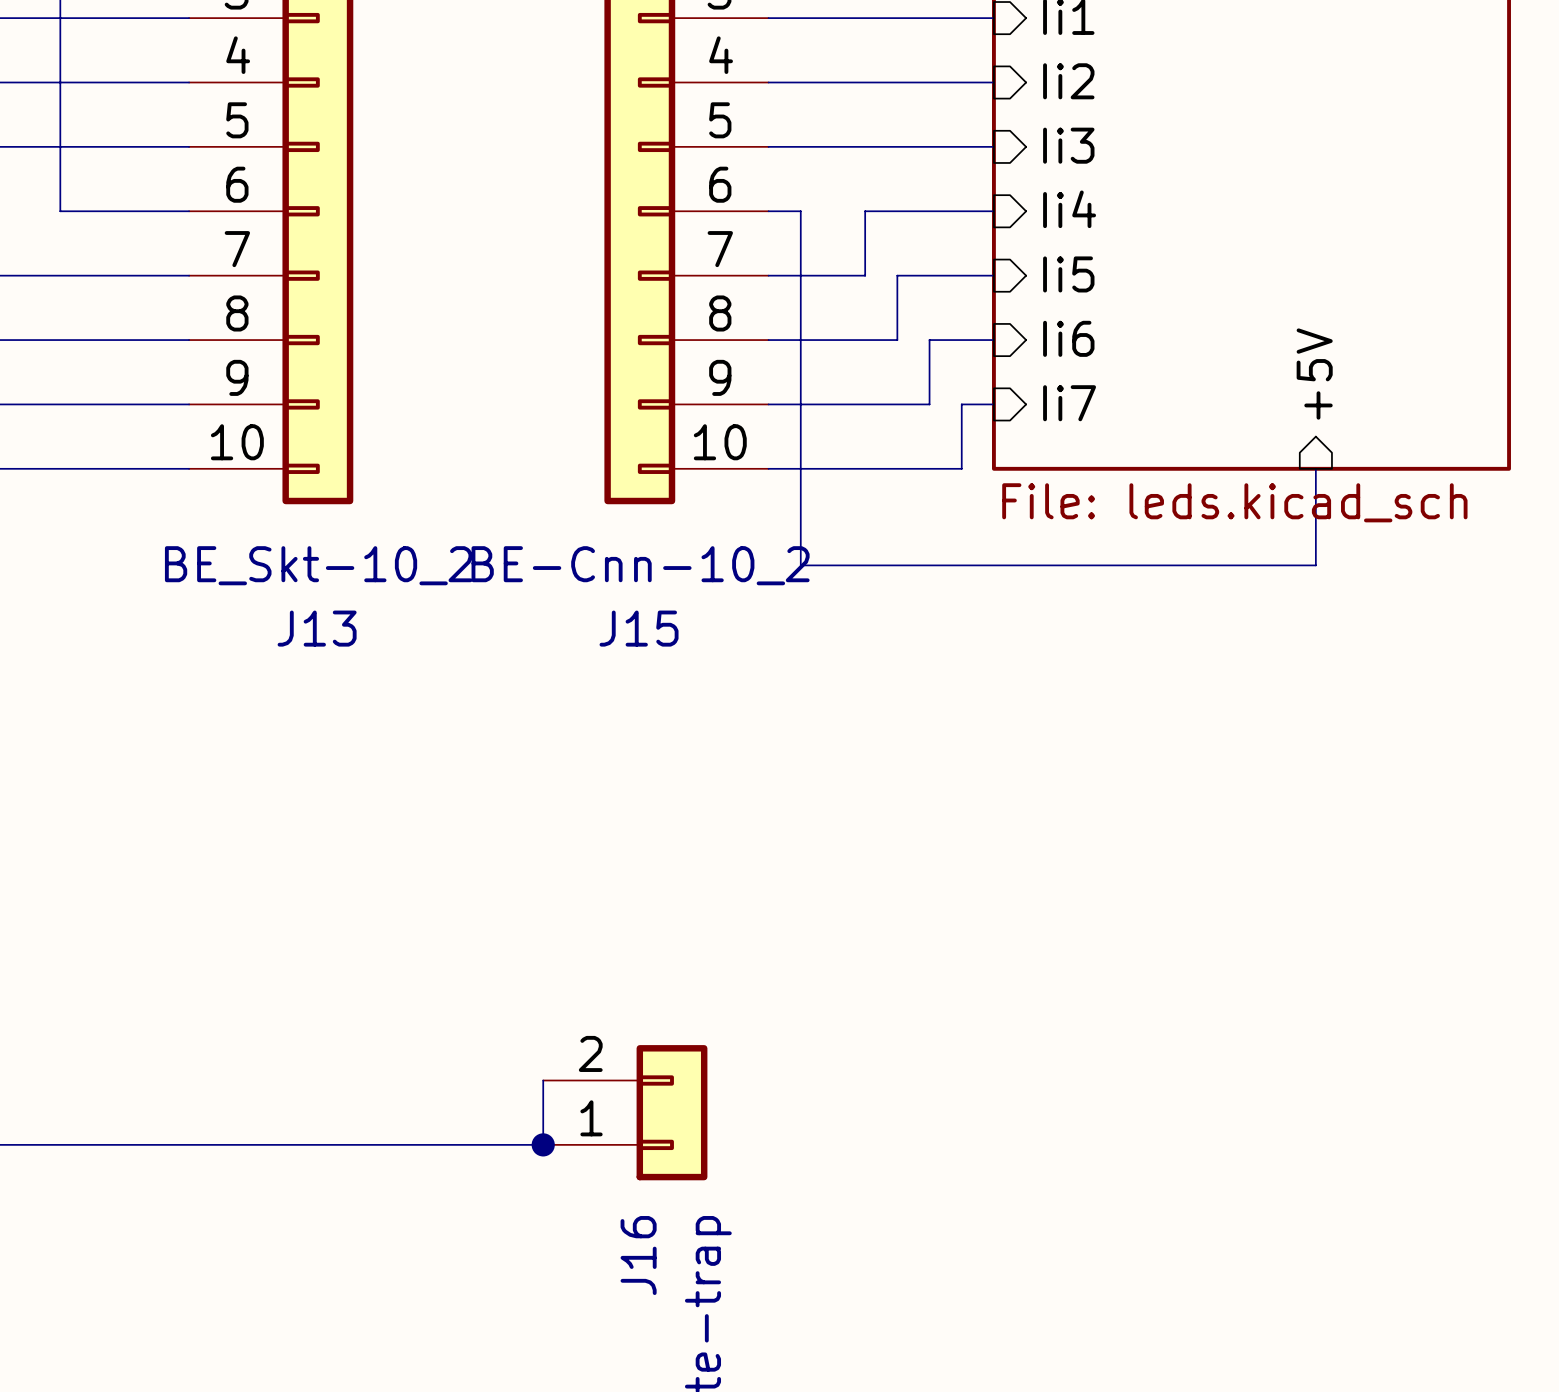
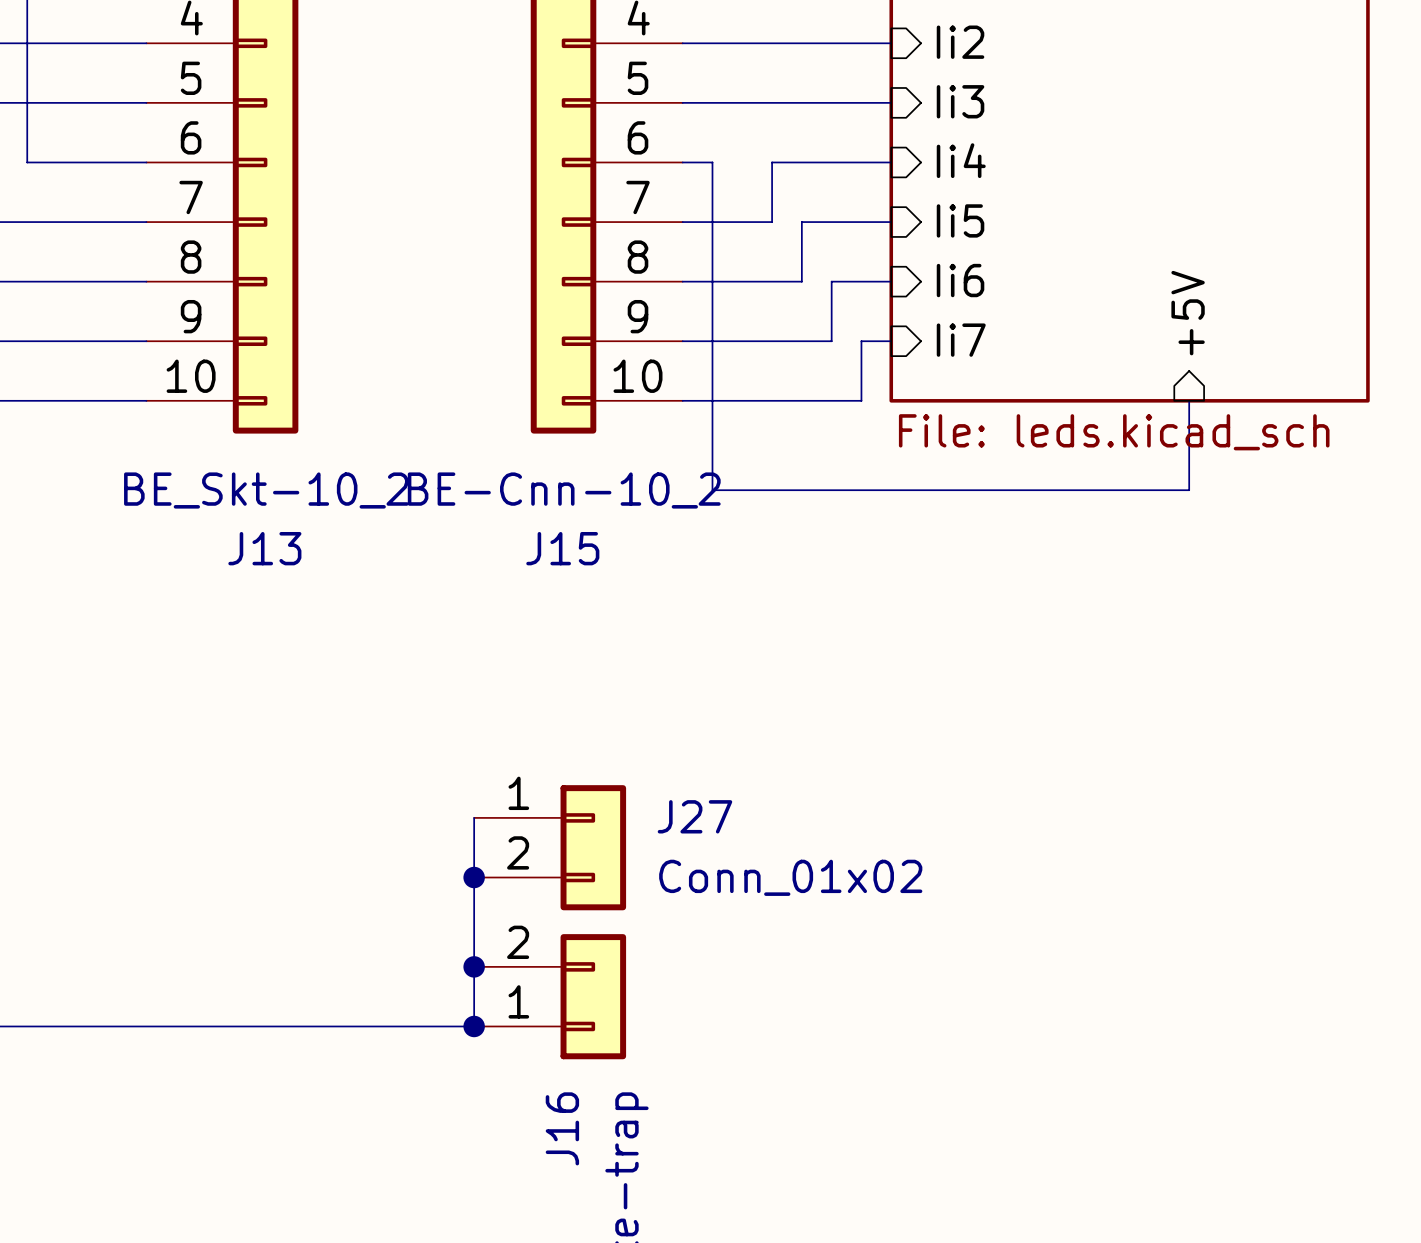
wire: none -> (474, 817) (474, 966)
J27: none -> Conn_01x02 (550, 847)
junction: none -> (474, 877)
junction: none -> (474, 966)

